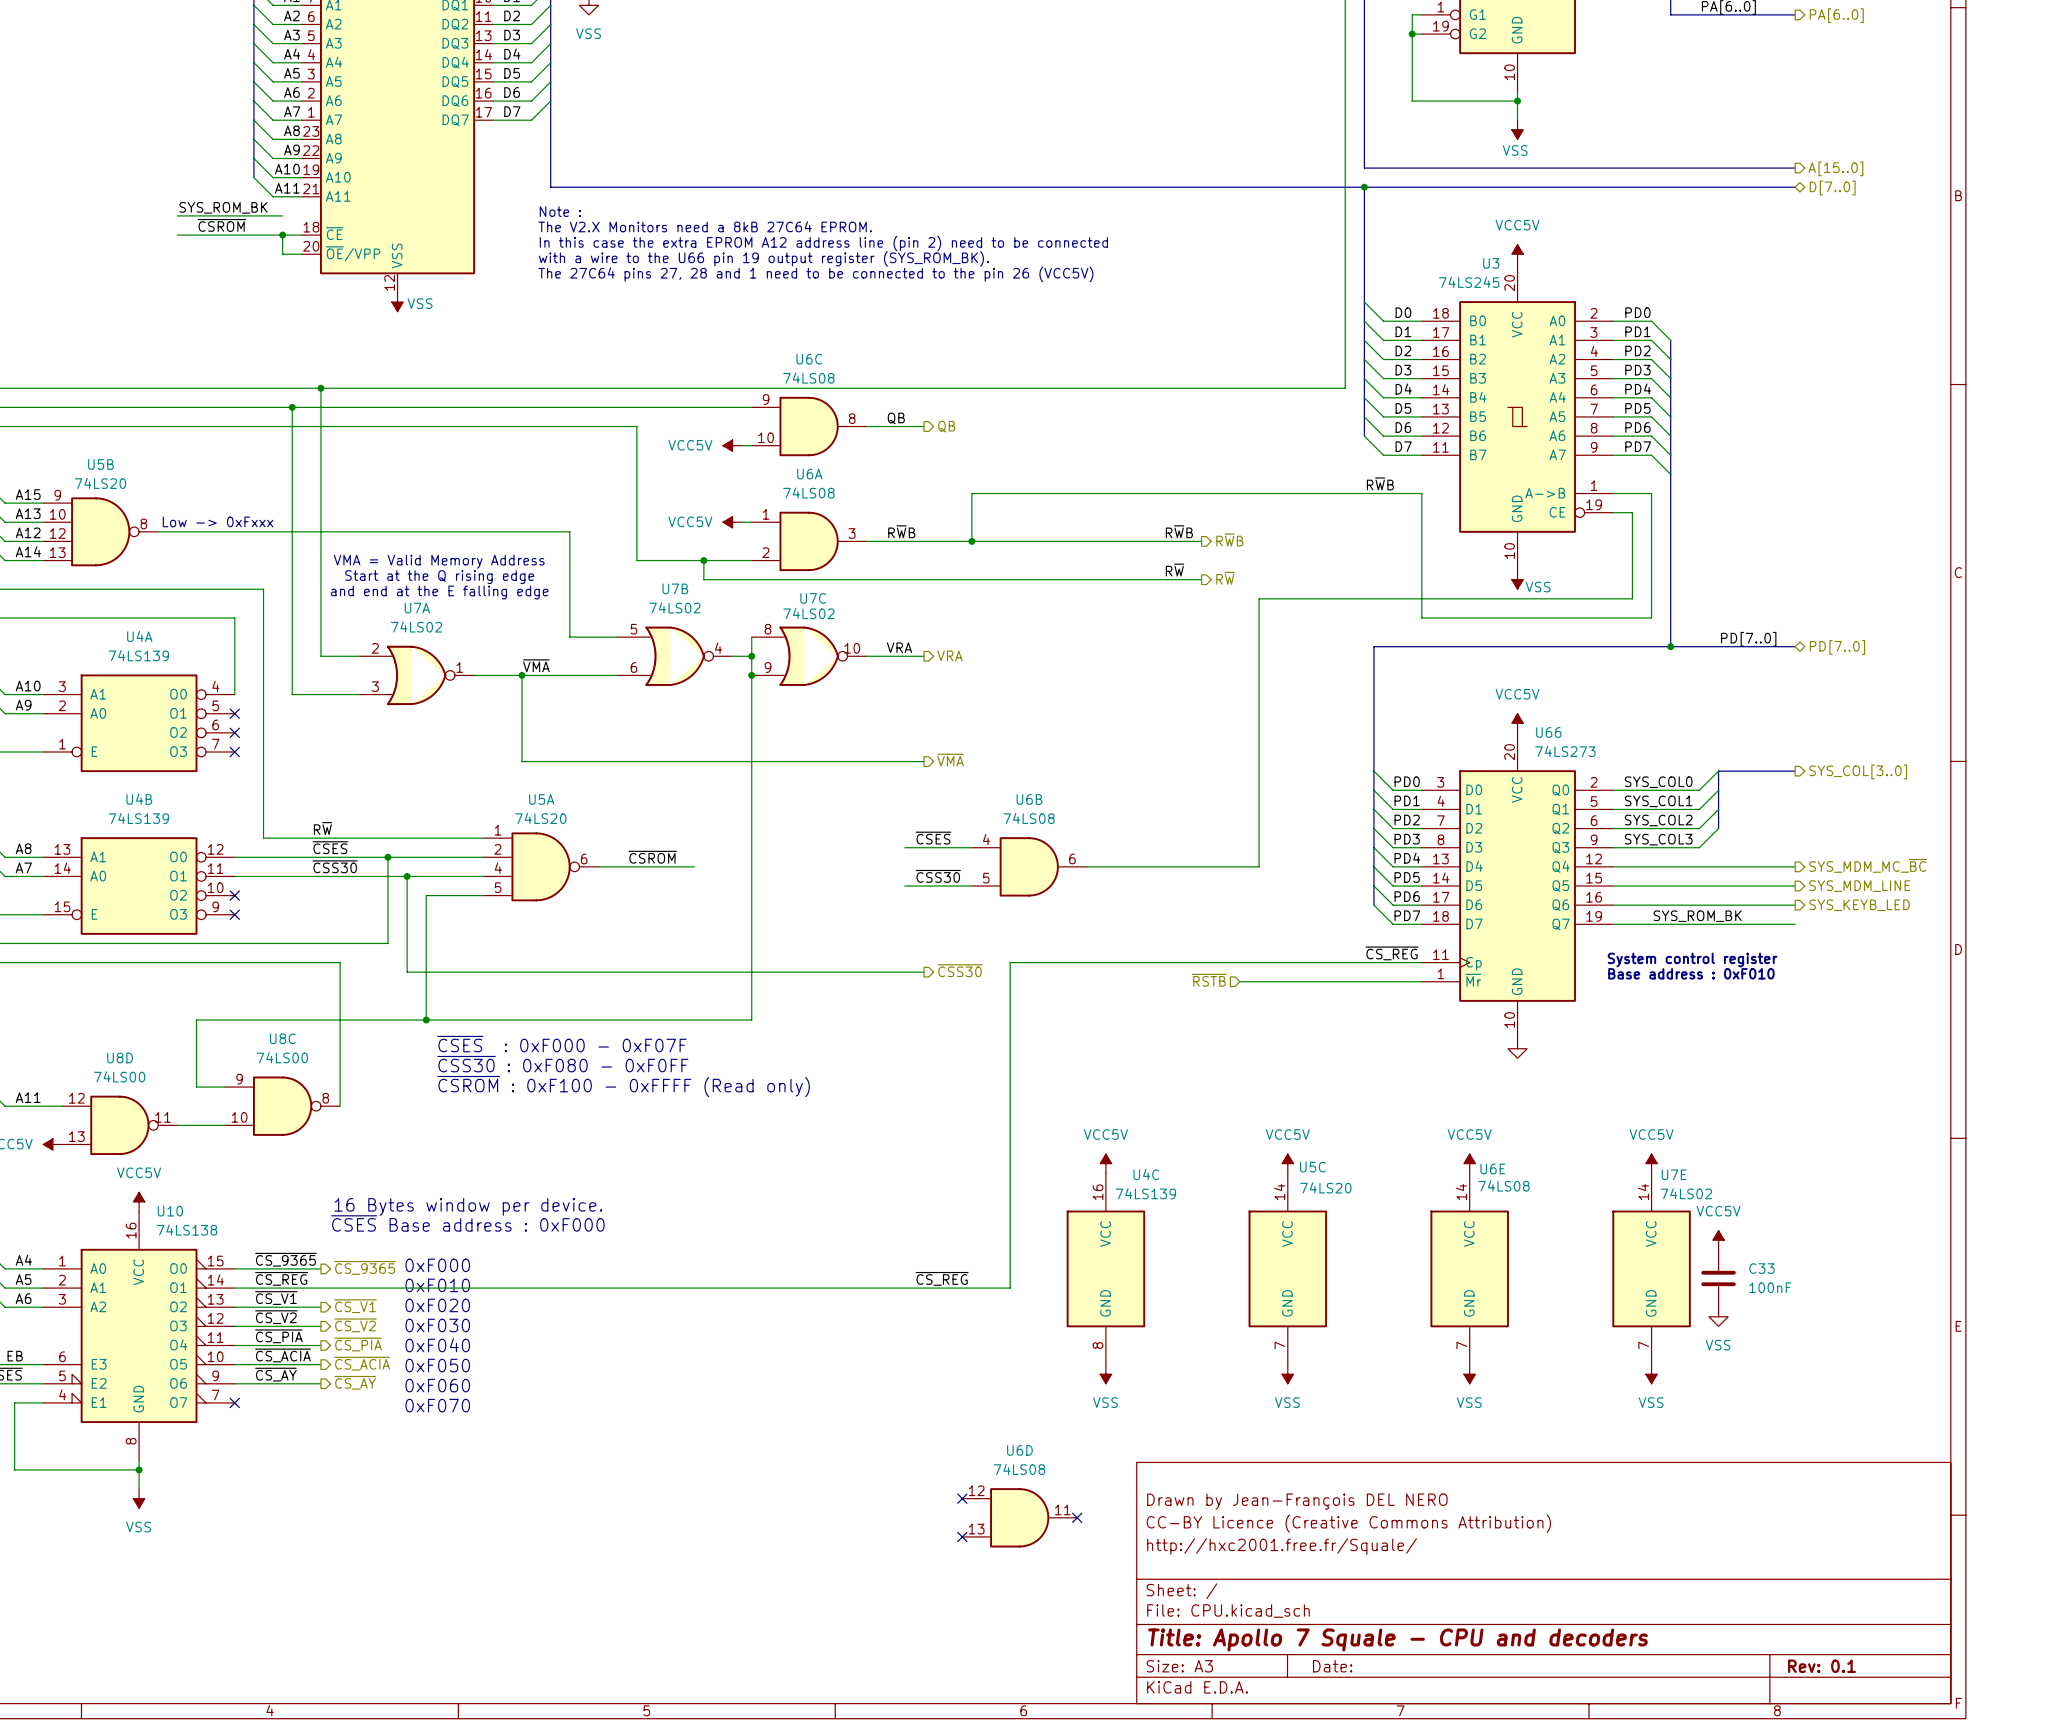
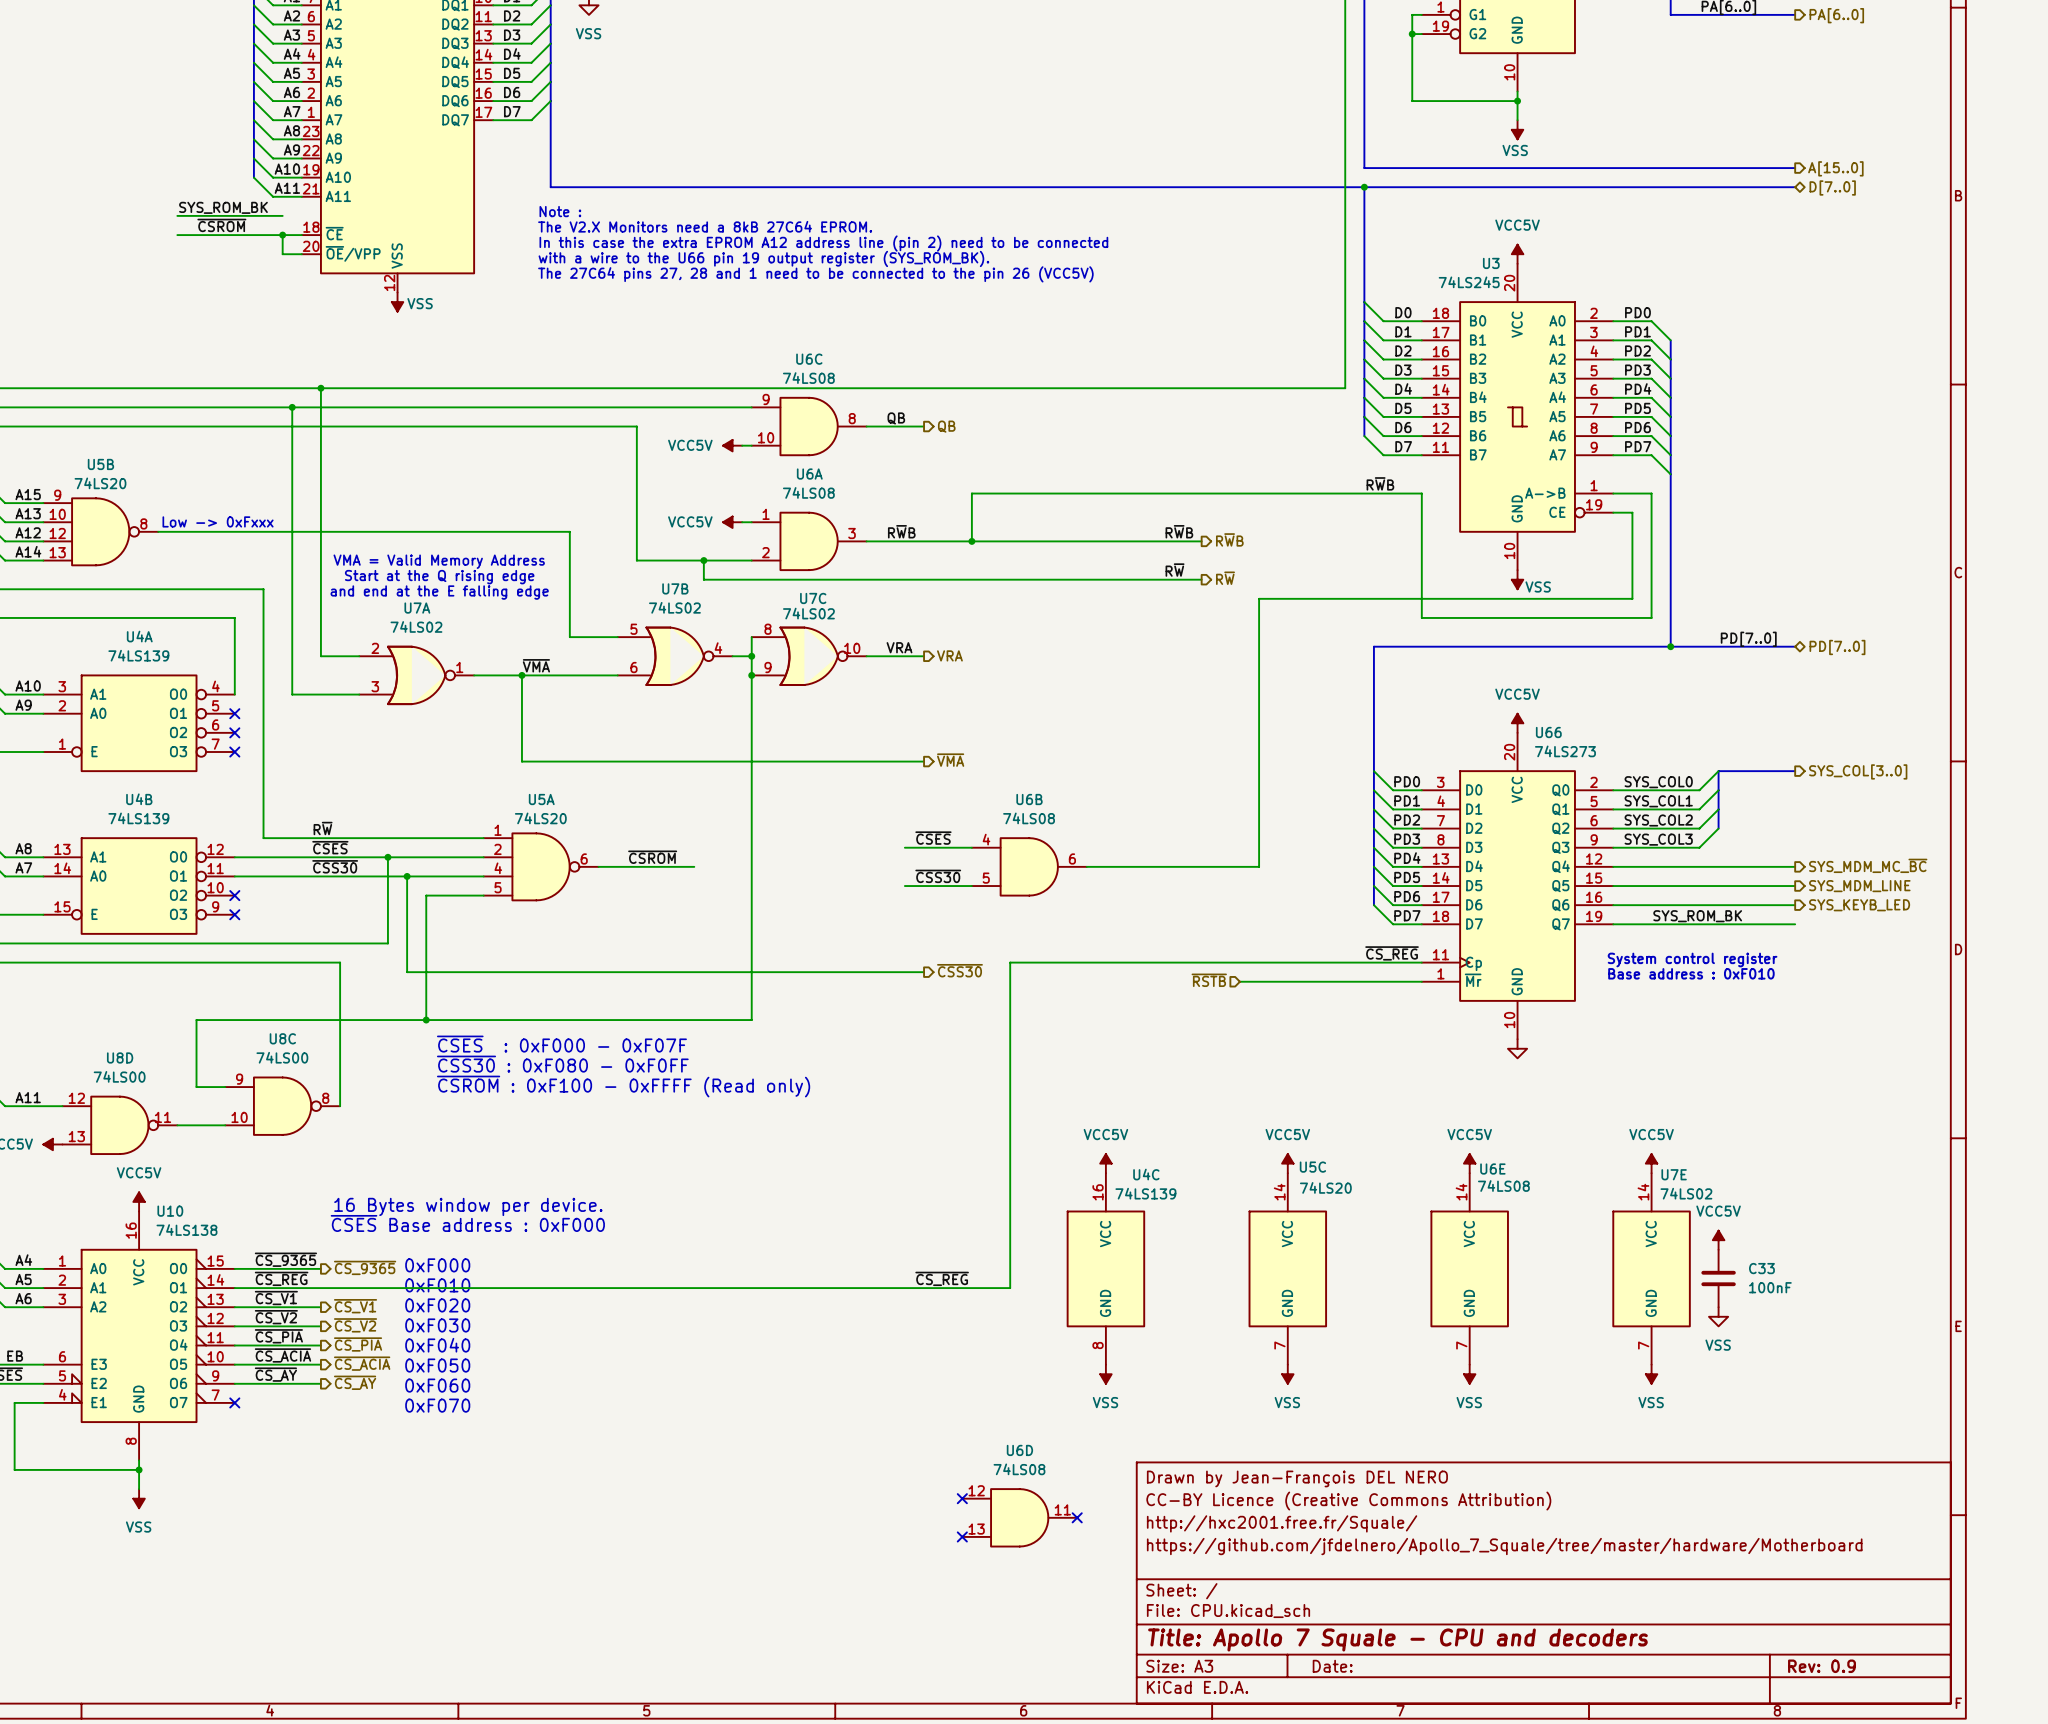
title block: none -> Drawn by Jean-François DEL NERO (1297, 1478)
title block: Drawn by Jean-François DEL NERO (1297, 1501) -> CC-BY Licence (Creative Commons Attribution) (1348, 1501)
title block: CC-BY Licence (Creative Commons Attribution) (1348, 1523) -> http://hxc2001.free.fr/Squale/ (1282, 1523)
title block: http://hxc2001.free.fr/Squale/ (1282, 1546) -> https://github.com/jfdelnero/Apollo_7_Squale/tree/master/hardware/Motherboard (1504, 1546)
title block: Rev: 0.1 (1822, 1666) -> Rev: 0.9 (1822, 1666)

